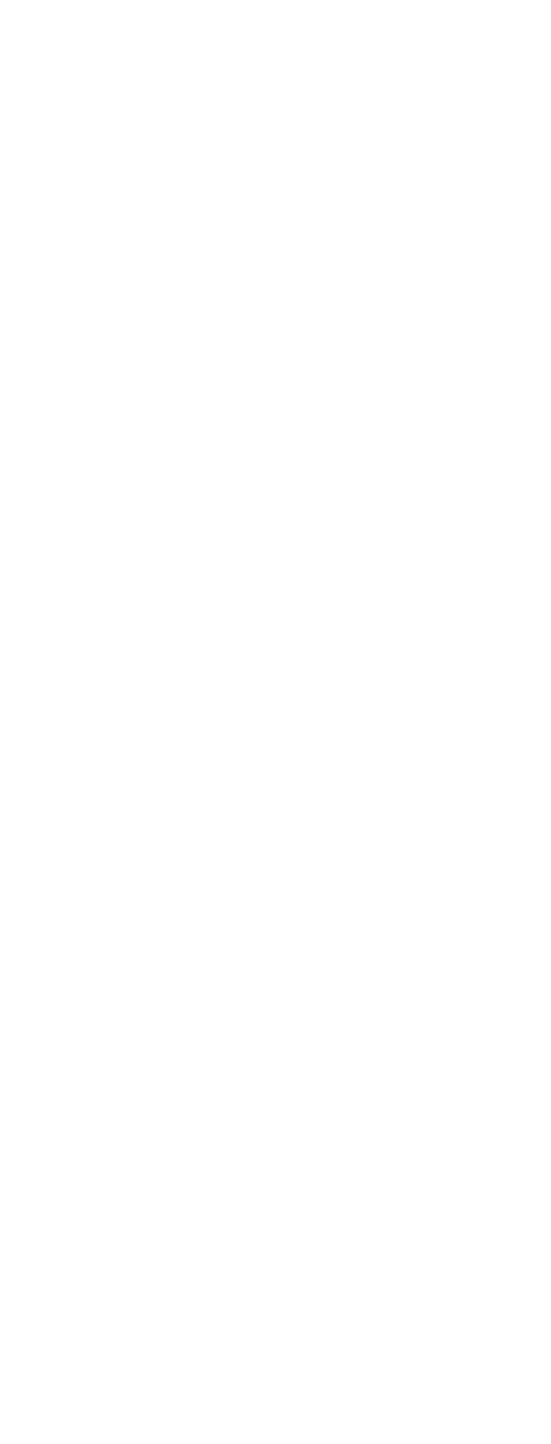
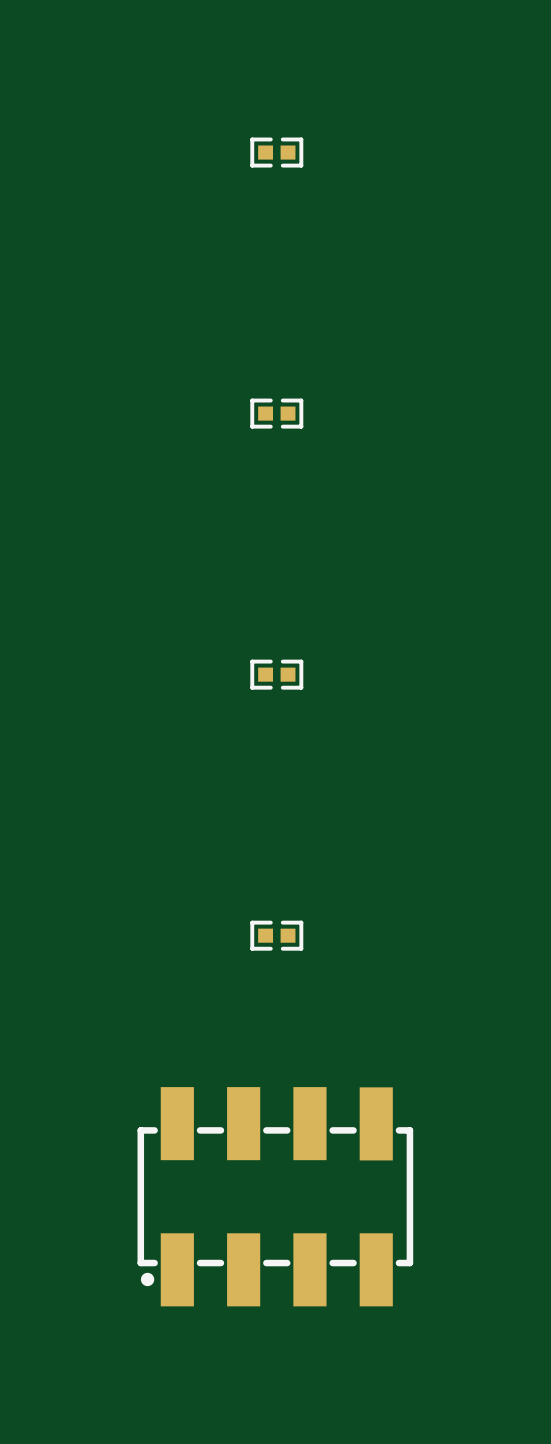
part: none -> (276, 152)
part: none -> (276, 413)
part: none -> (276, 674)
part: none -> (276, 935)
part: none -> (275, 1196)

